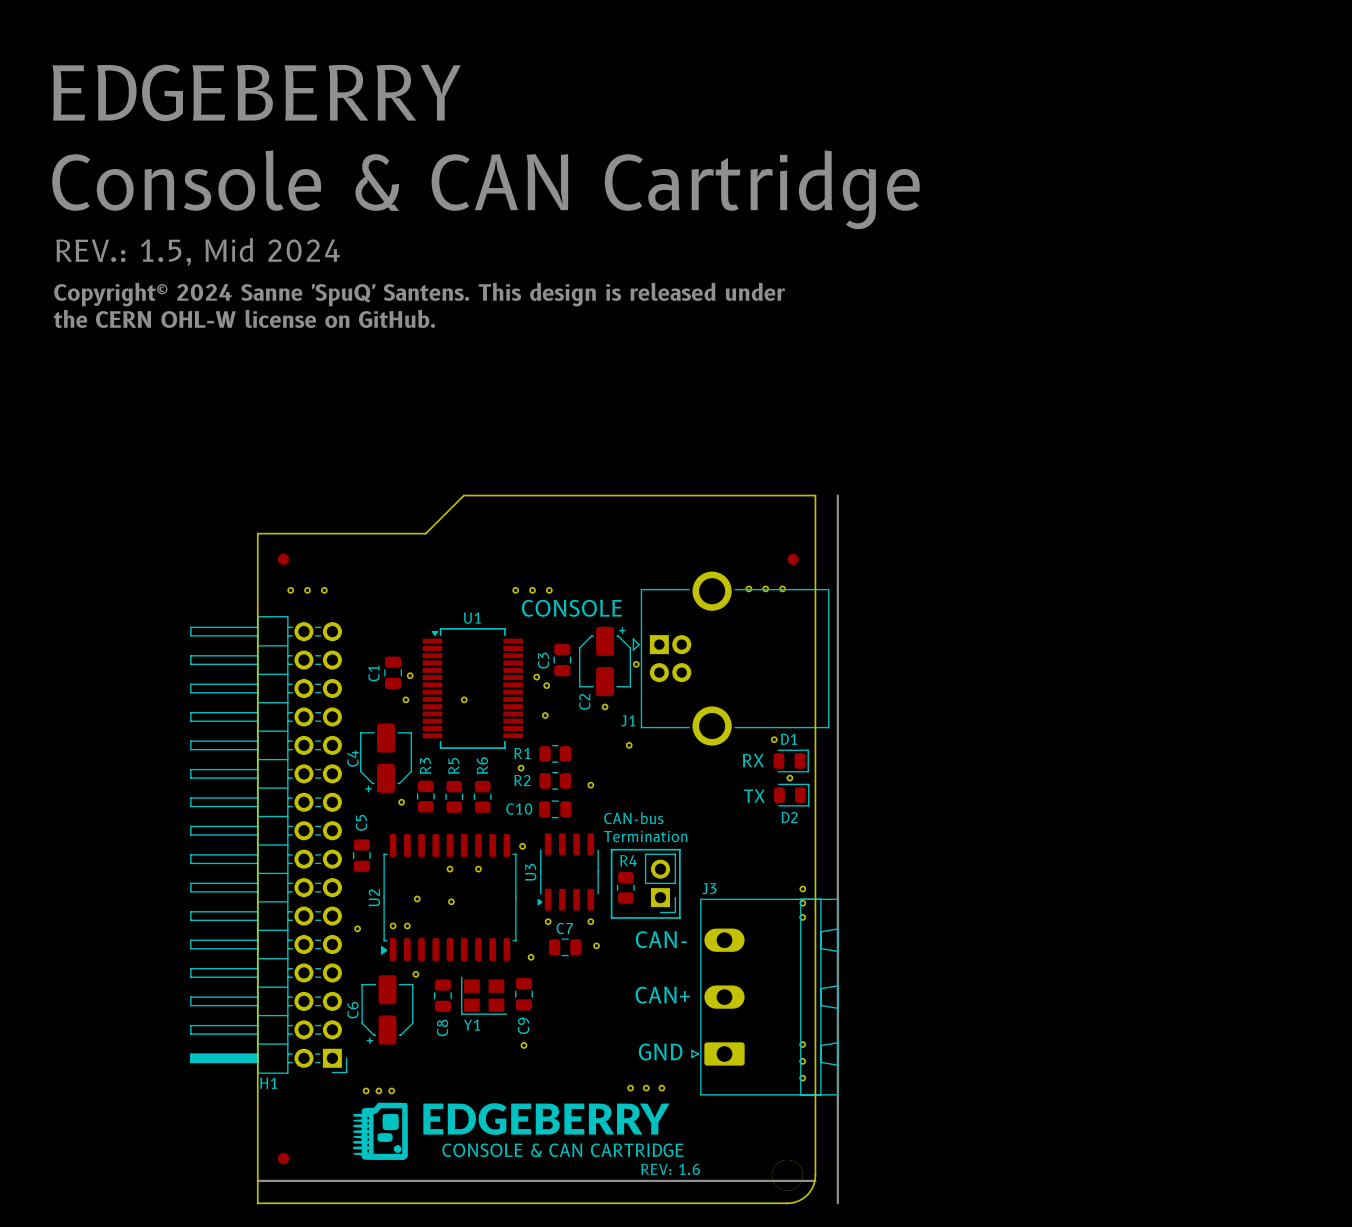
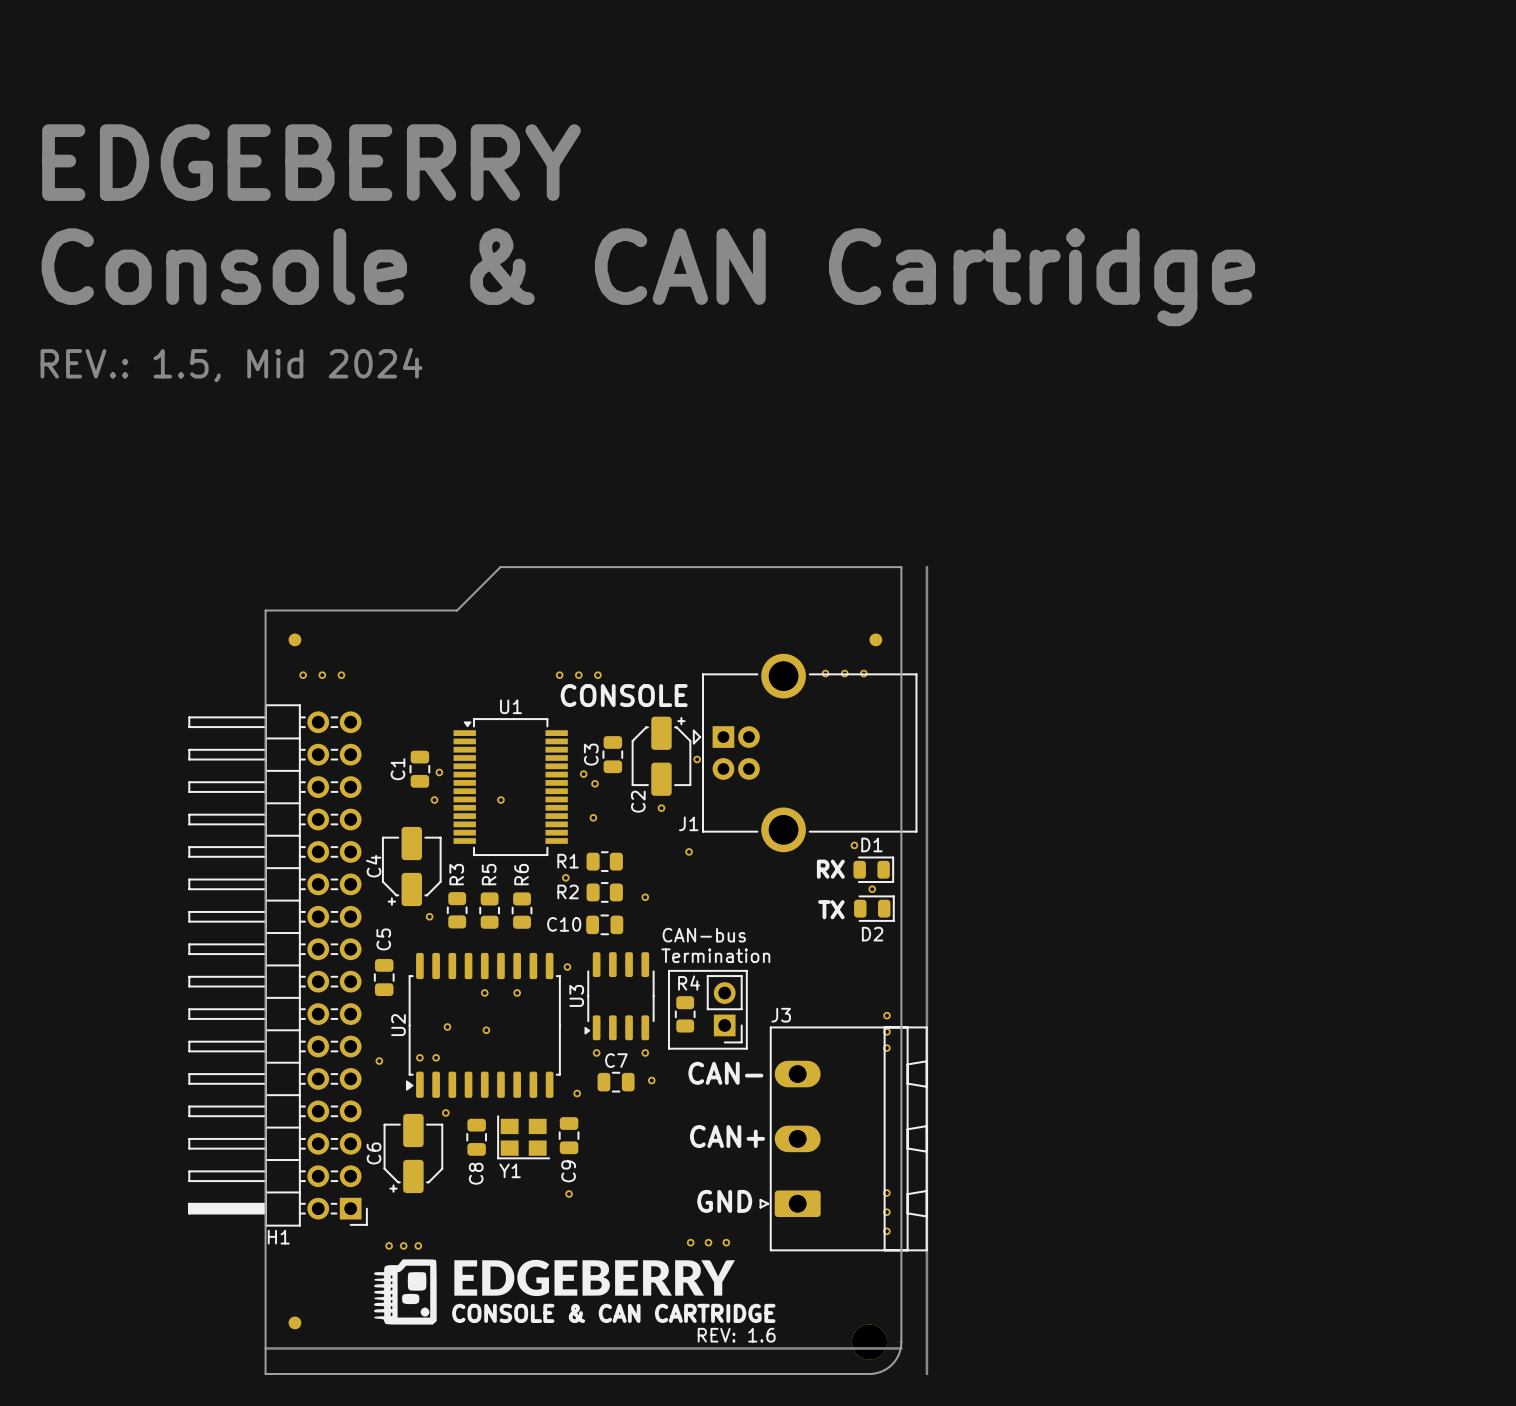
text position: EDGEBERRY (256, 92) -> EDGEBERRY (311, 162)
text position: Console & CAN Cartridge (485, 189) -> Console & CAN Cartridge (648, 277)
text position: REV.: 1.5, Mid 2024 (198, 252) -> REV.: 1.5, Mid 2024 (231, 365)
text: Copyright© 2024 Sanne 'SpuQ' Santens. This design is released under (419, 294) -> none
text: the CERN OHL-W license on GitHub. (244, 318) -> none

